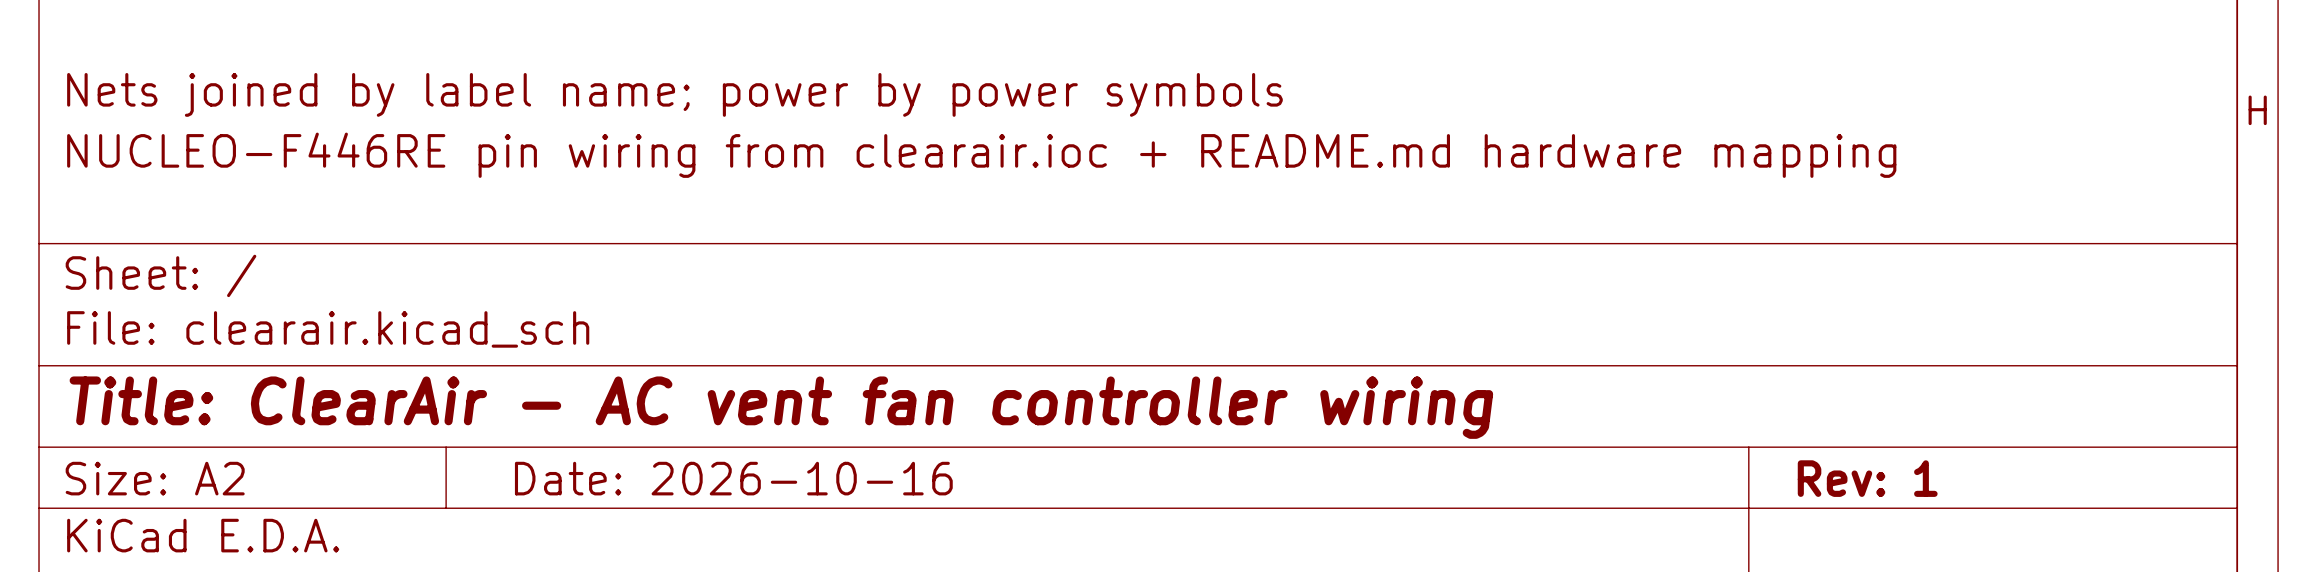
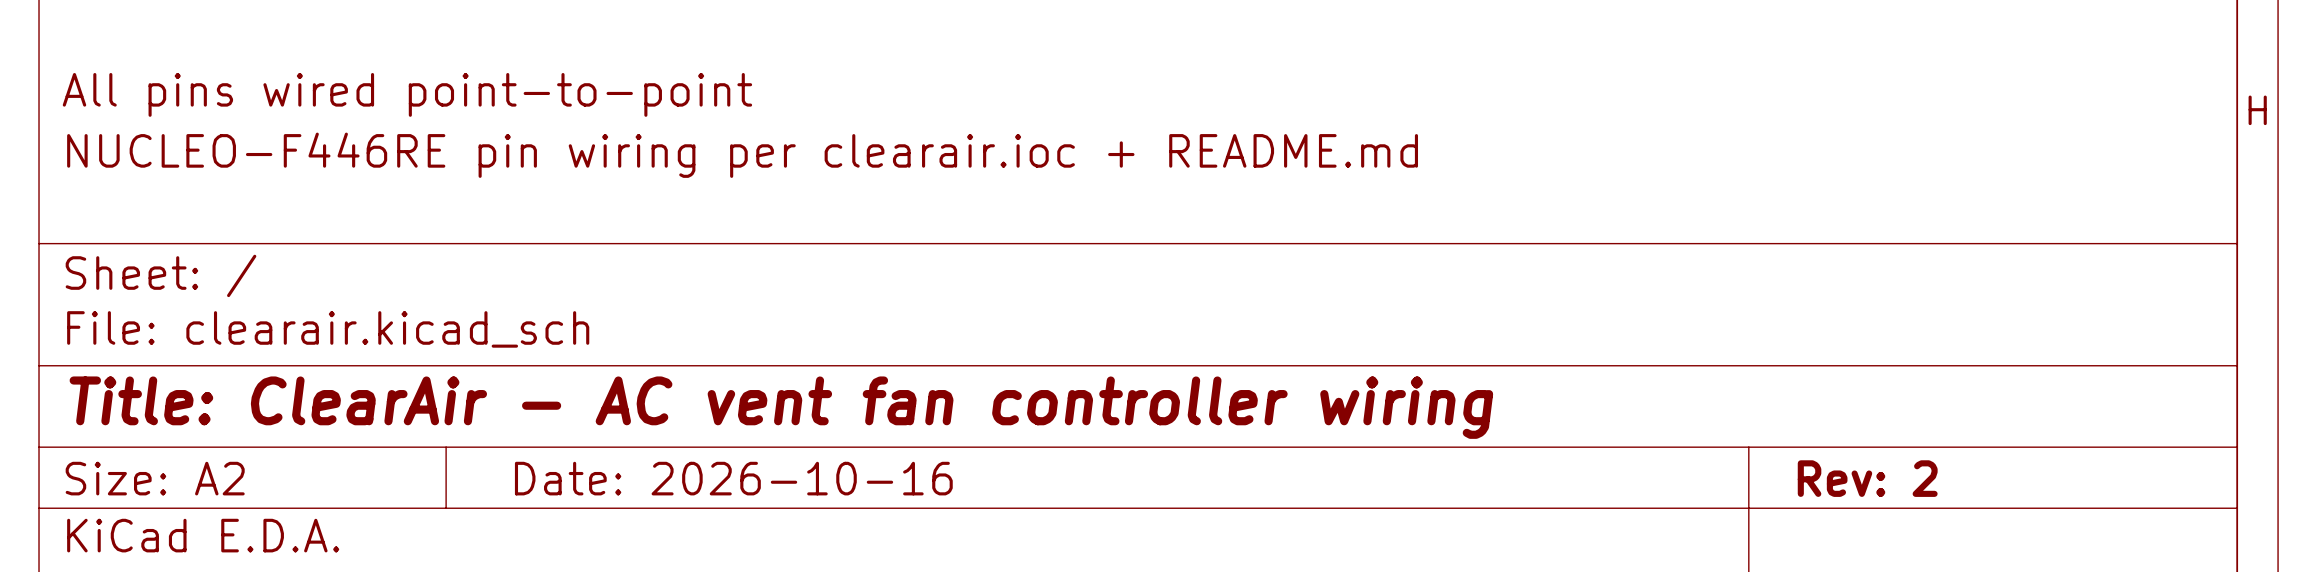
title block: Nets joined by label name; power by power symbols (674, 94) -> All pins wired point-to-point (407, 94)
title block: NUCLEO-F446RE pin wiring from clearair.ioc + README.md hardware mapping (981, 155) -> NUCLEO-F446RE pin wiring per clearair.ioc + README.md (742, 155)
title block: Rev: 1 (1867, 478) -> Rev: 2 (1867, 478)

